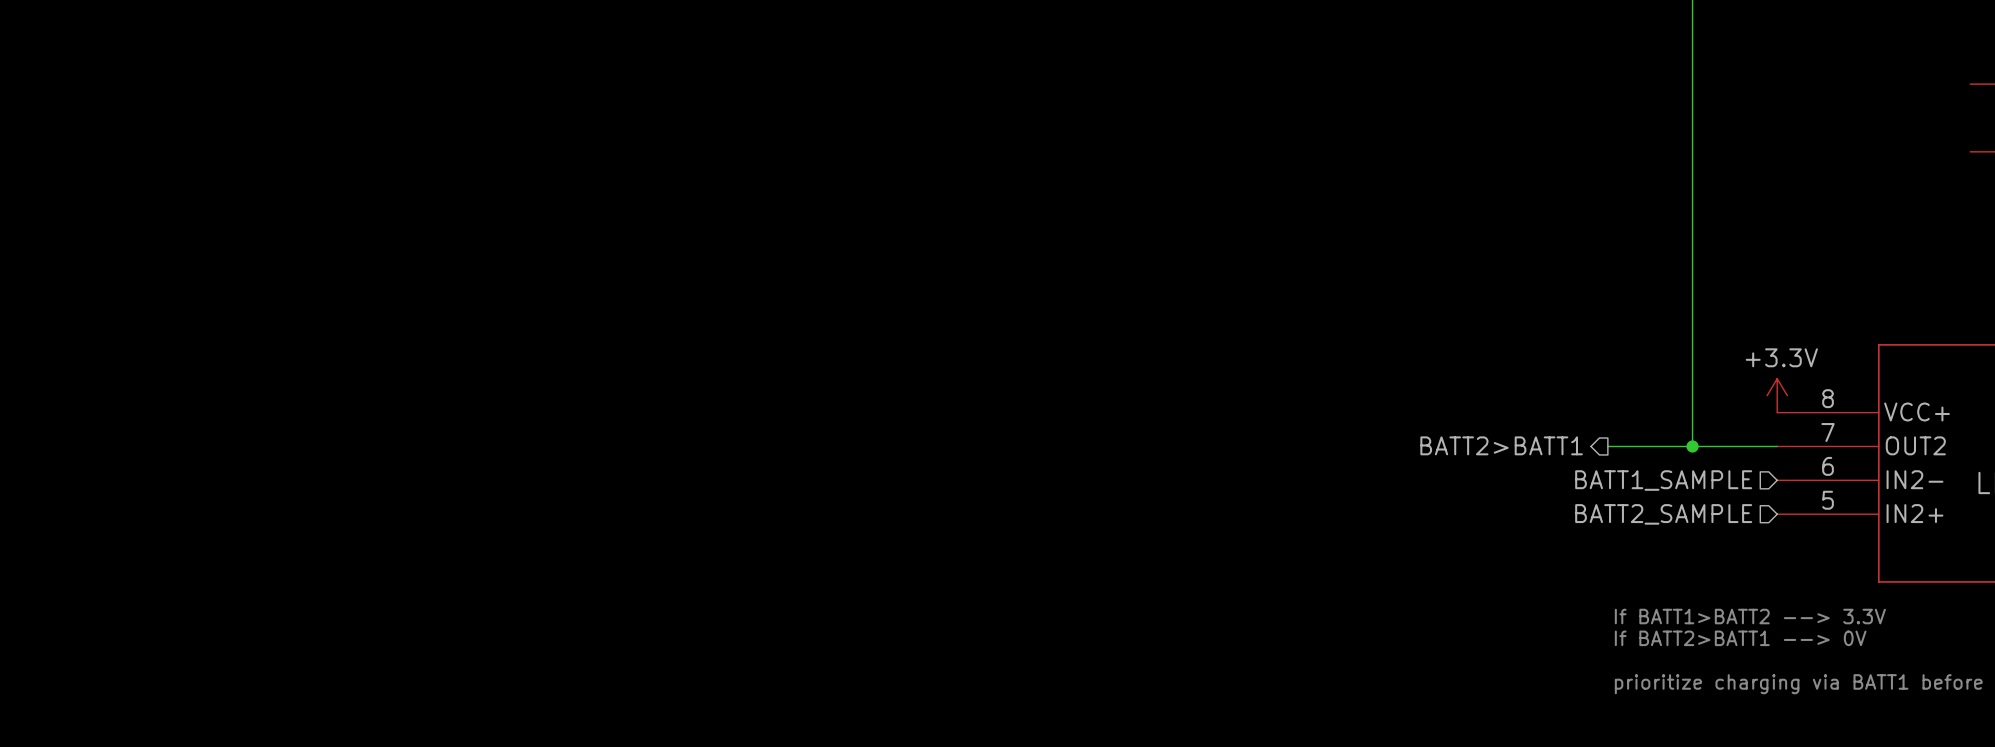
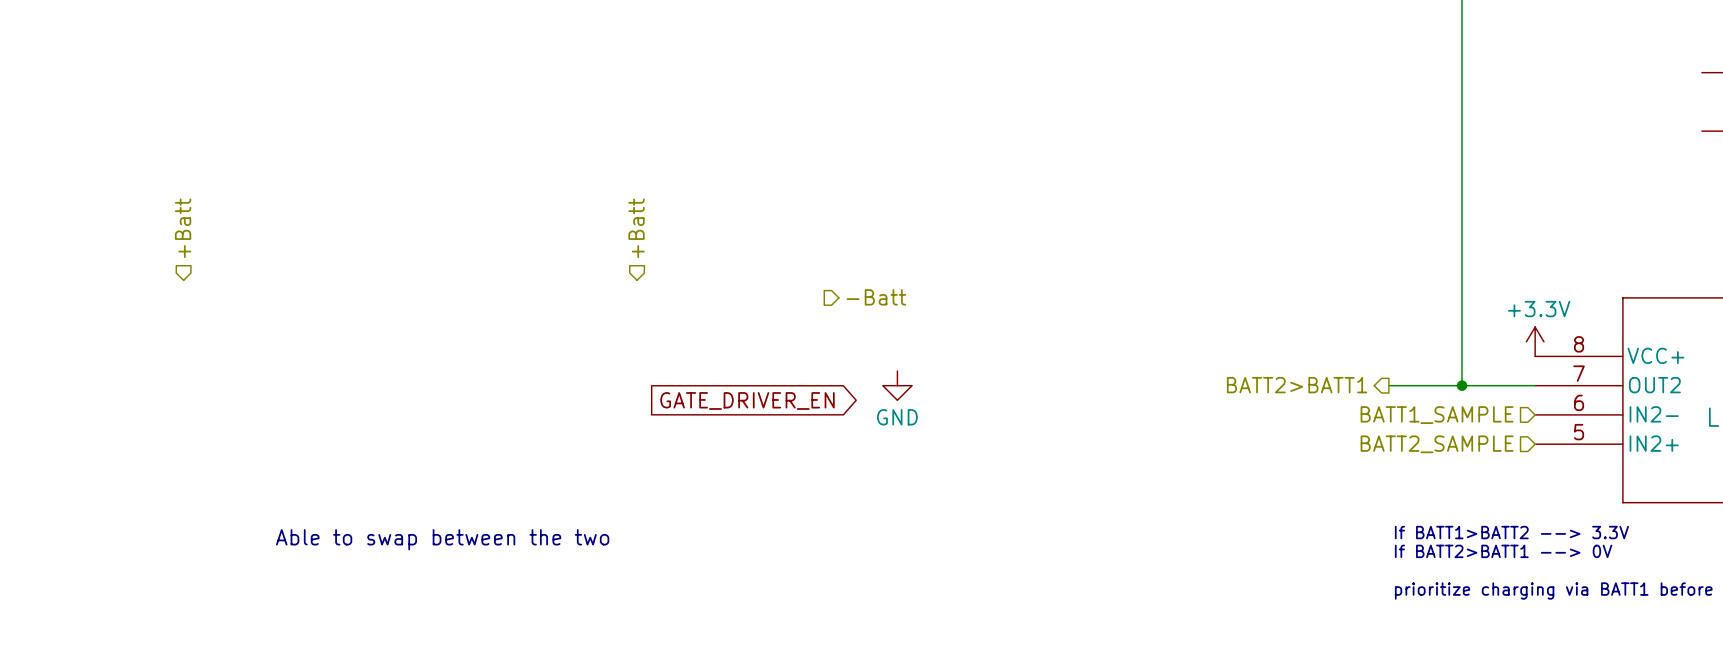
hierarchical label: none -> +Batt (183, 228)
hierarchical label: none -> +Batt (636, 228)
hierarchical label: none -> -Batt (876, 297)
power symbol: none -> GND (897, 385)
global label: none -> GATE_DRIVER_EN (747, 400)
text: none -> Able to swap between the two (442, 539)

